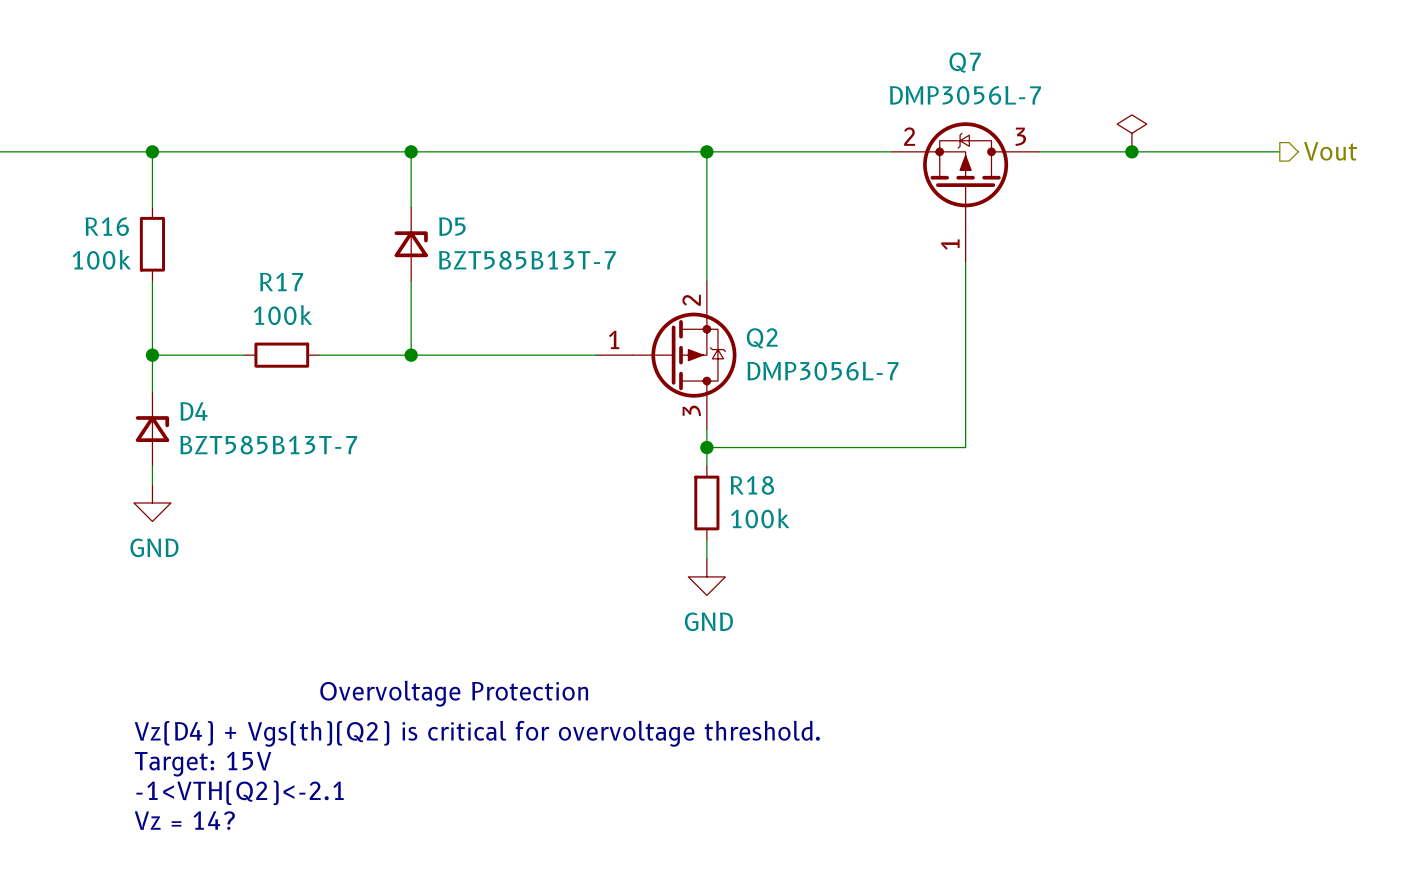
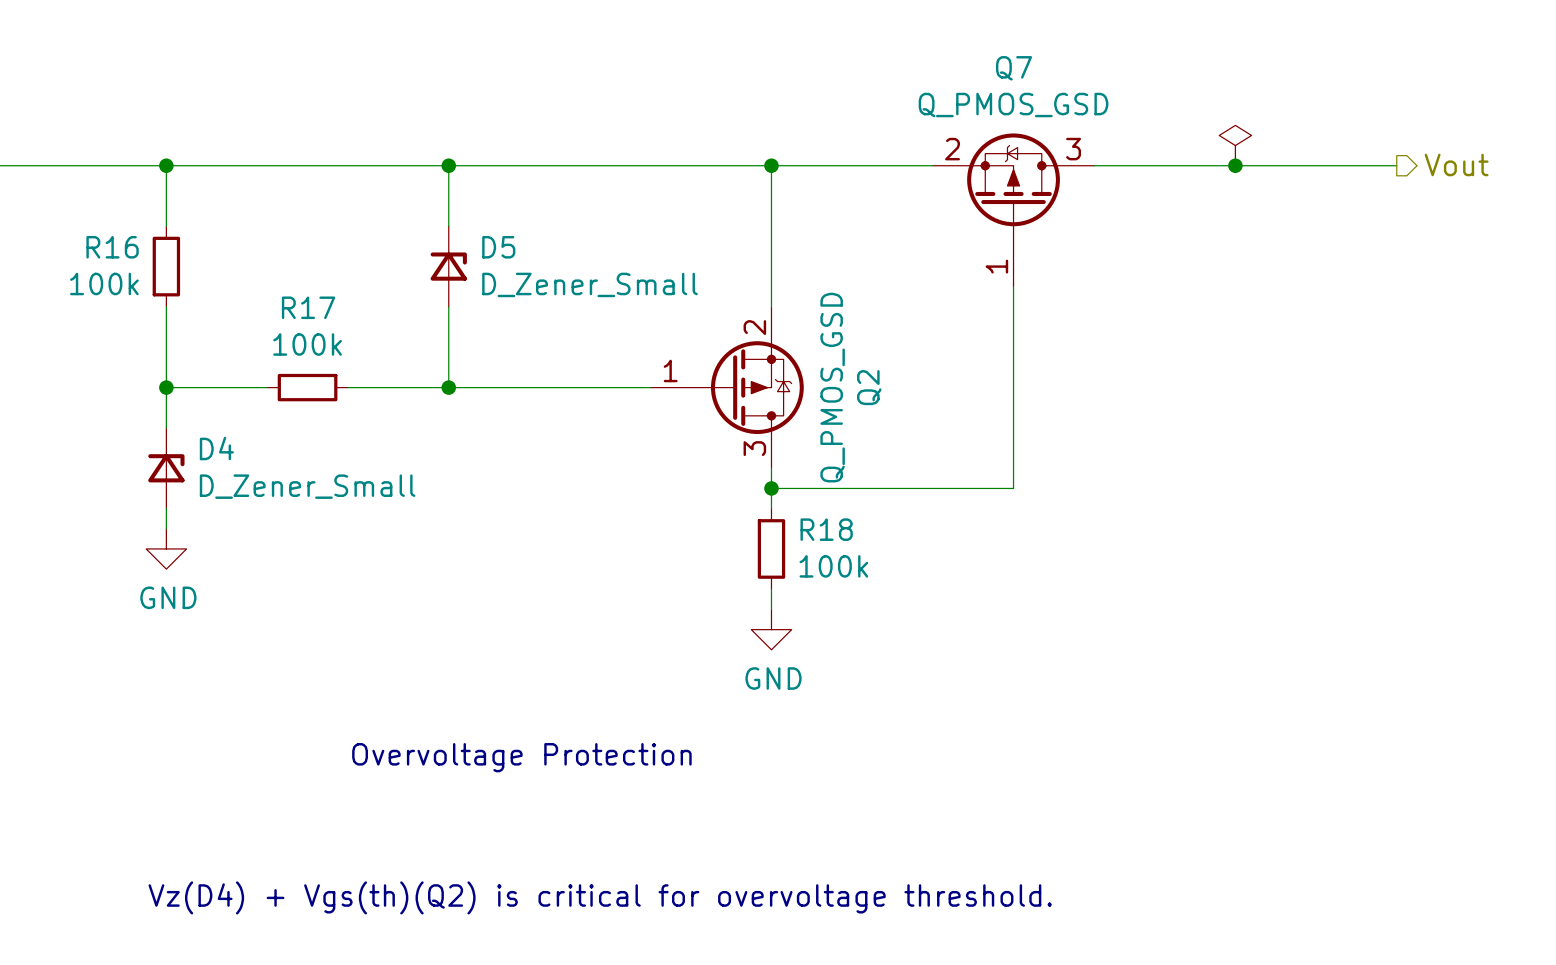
Q7 text: DMP3056L-7 (965, 95) -> none
Q7 value: none -> Q_PMOS_GSD (1013, 105)
Q7 position: (965, 192) -> (1013, 210)
D5 value: BZT585B13T-7 (527, 260) -> D_Zener_Small (590, 284)
wire: (965, 262) (965, 447) (928, 447) -> (1013, 286) (1013, 488)
Q2 name rotation: 0° (762, 338) -> 90° counterclockwise (869, 387)
Q2 value: none -> Q_PMOS_GSD (832, 387)
Q2 text: DMP3056L-7 (822, 371) -> none
D4 value: BZT585B13T-7 (268, 445) -> D_Zener_Small (307, 486)
text: Vz(D4) + Vgs(th)(Q2) is critical for overvoltage threshold. (477, 733) -> none
text: Target: 15V (203, 764) -> none
text: -1<VTH(Q2)<-2.1 (240, 792) -> none
text: Vz = 14? (184, 820) -> Vz(D4) + Vgs(th)(Q2) is critical for overvoltage threshold. (600, 897)

